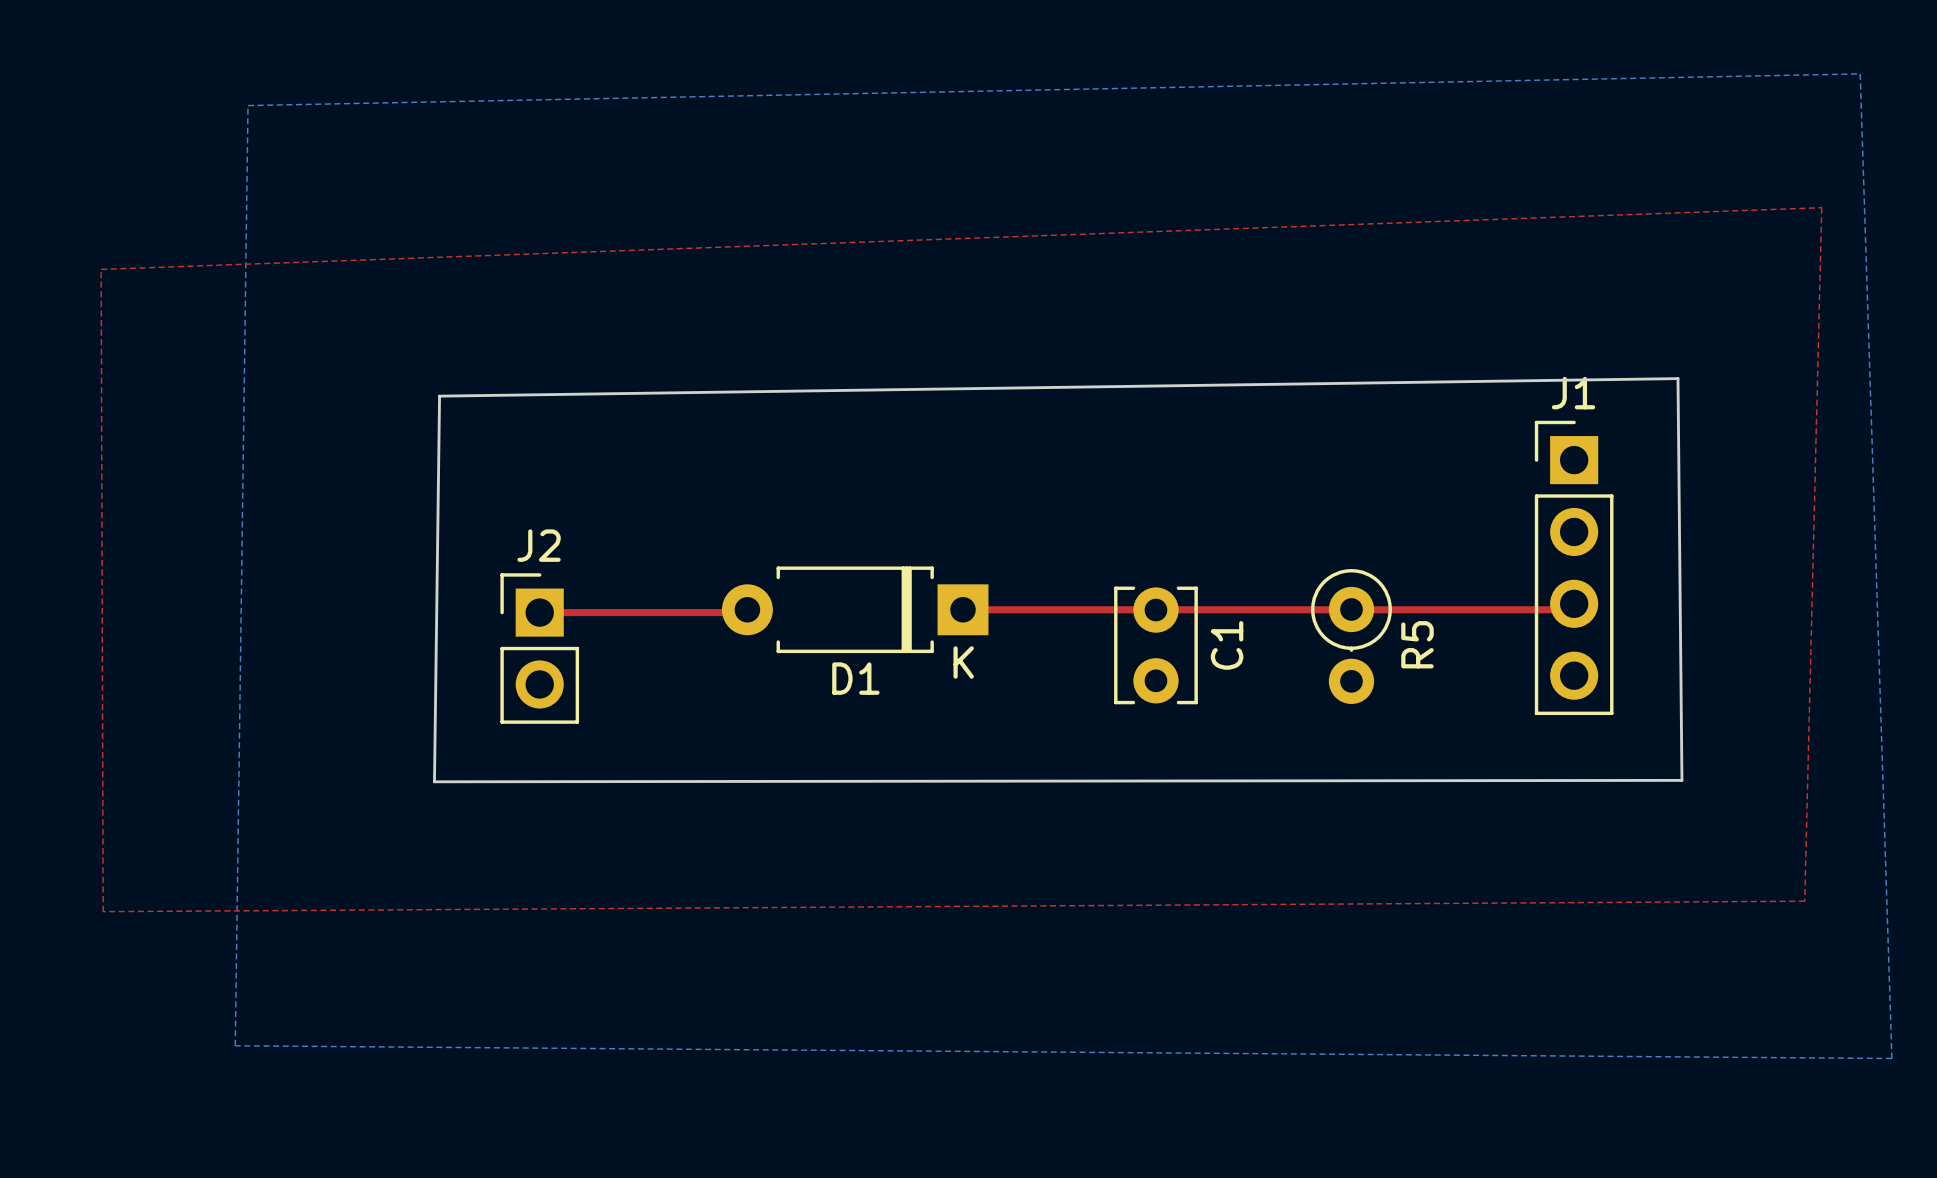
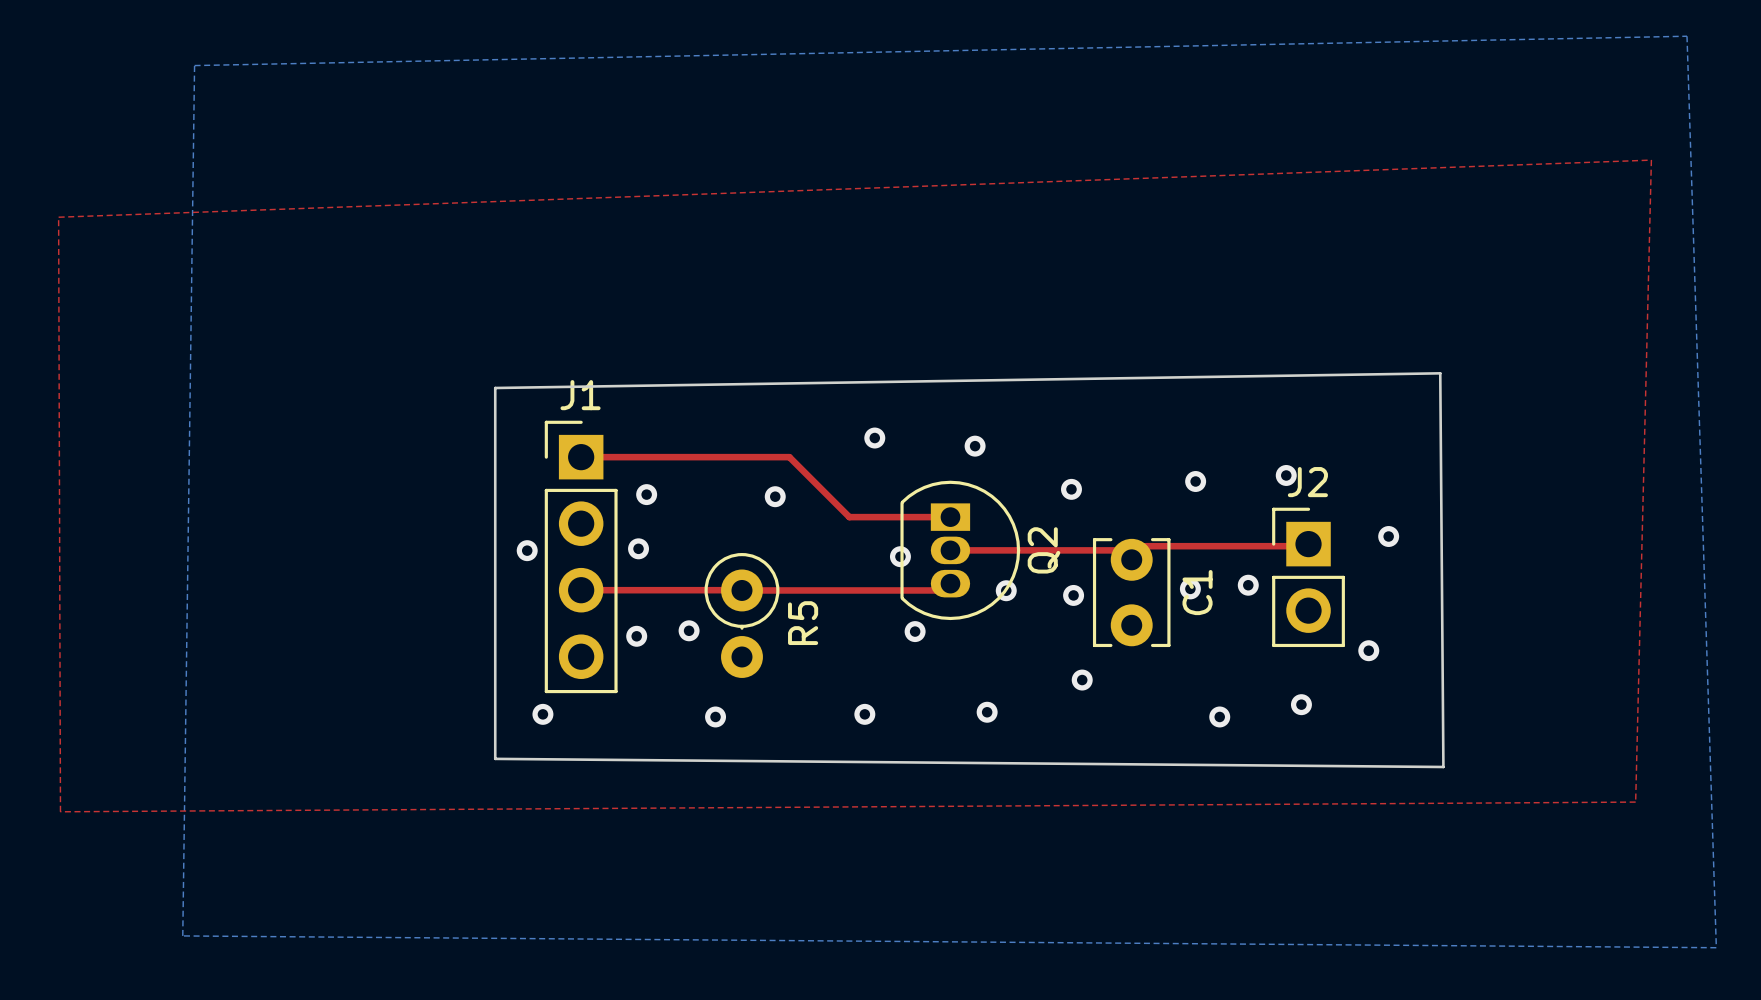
board edge: (1677, 378) (1681, 780) (434, 781) (439, 396) (1677, 378) -> (1440, 373) (495, 387) (495, 758) (1443, 766) (1440, 373)
via: none -> (874, 438)
via: none -> (975, 446)
top track: none -> (581, 457) (789, 457) (849, 517) (948, 517)
via: none -> (1286, 475)
via: none -> (1195, 481)
via: none -> (1071, 489)
J1 position: (1574, 567) -> (581, 556)
via: none -> (646, 494)
via: none -> (775, 496)
top track: (1574, 603) (1568, 609) (1158, 609) (1155, 607) (1153, 609) (963, 609) -> none
D1: (855, 609) -> none
top track: (750, 610) (747, 612) (539, 612) -> none
via: none -> (1388, 536)
top track: none -> (1305, 546) (1145, 546) (1130, 561) (1120, 550) (950, 550)
via: none -> (638, 548)
via: none -> (527, 550)
Q2: none -> (960, 550)
via: none -> (900, 556)
R5 position: (1351, 636) -> (741, 615)
C1 position: (1155, 645) -> (1131, 592)
J2 position: (539, 648) -> (1308, 577)
top track: none -> (948, 584) (942, 590) (741, 590)
via: none -> (1248, 585)
via: none -> (1190, 588)
top track: none -> (581, 590) (743, 590)
via: none -> (1006, 590)
via: none -> (1073, 595)
via: none -> (689, 630)
via: none -> (915, 631)
via: none -> (636, 636)
via: none -> (1368, 650)
via: none -> (1082, 680)
via: none -> (1301, 704)
via: none -> (987, 712)
via: none -> (542, 714)
via: none -> (864, 714)
via: none -> (715, 716)
via: none -> (1219, 716)

